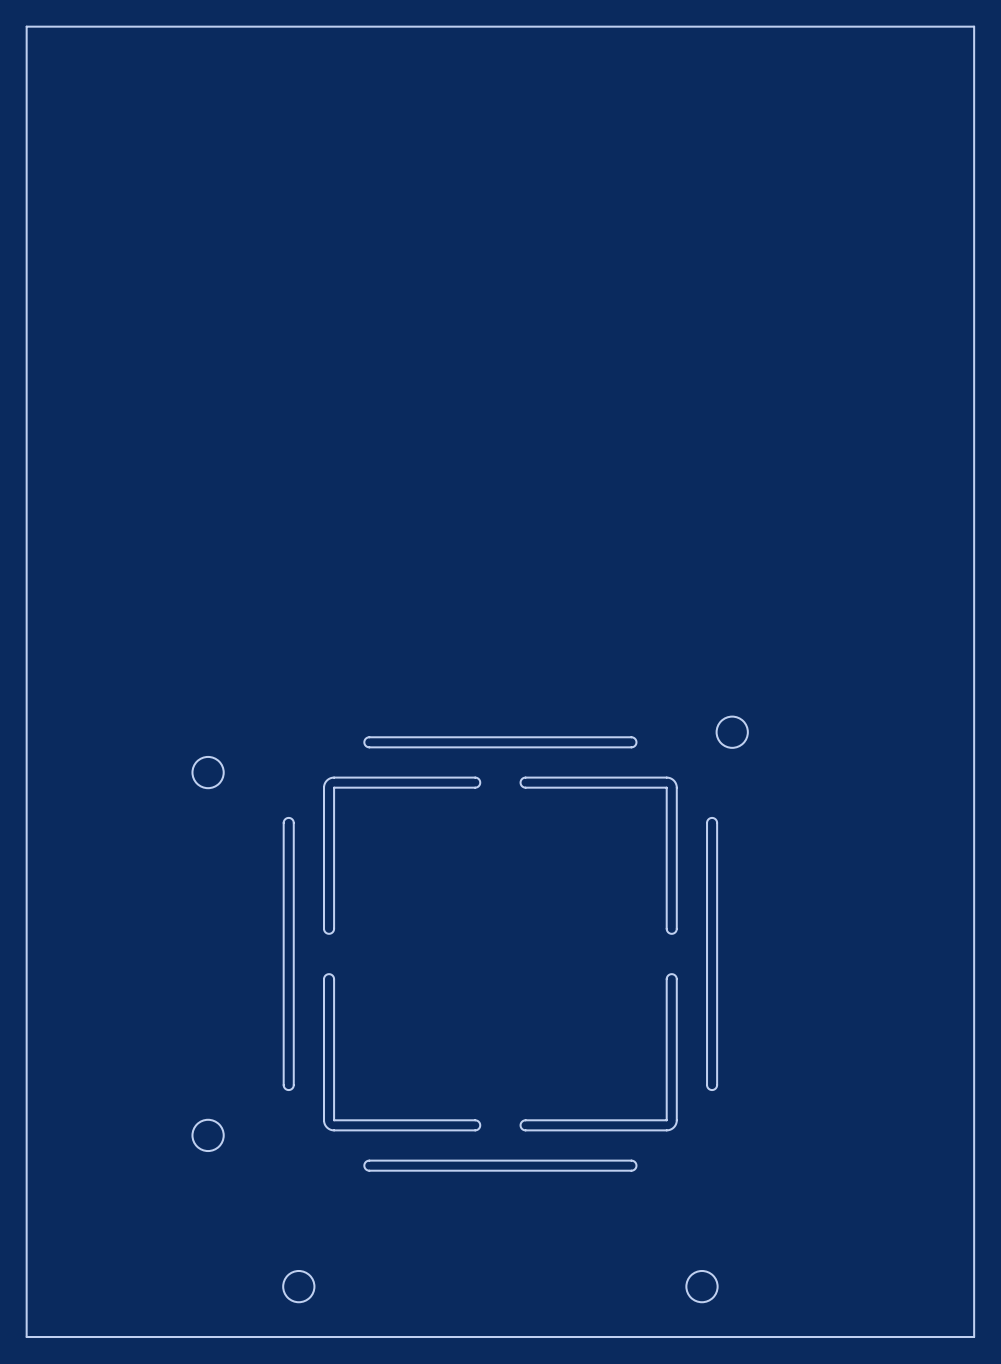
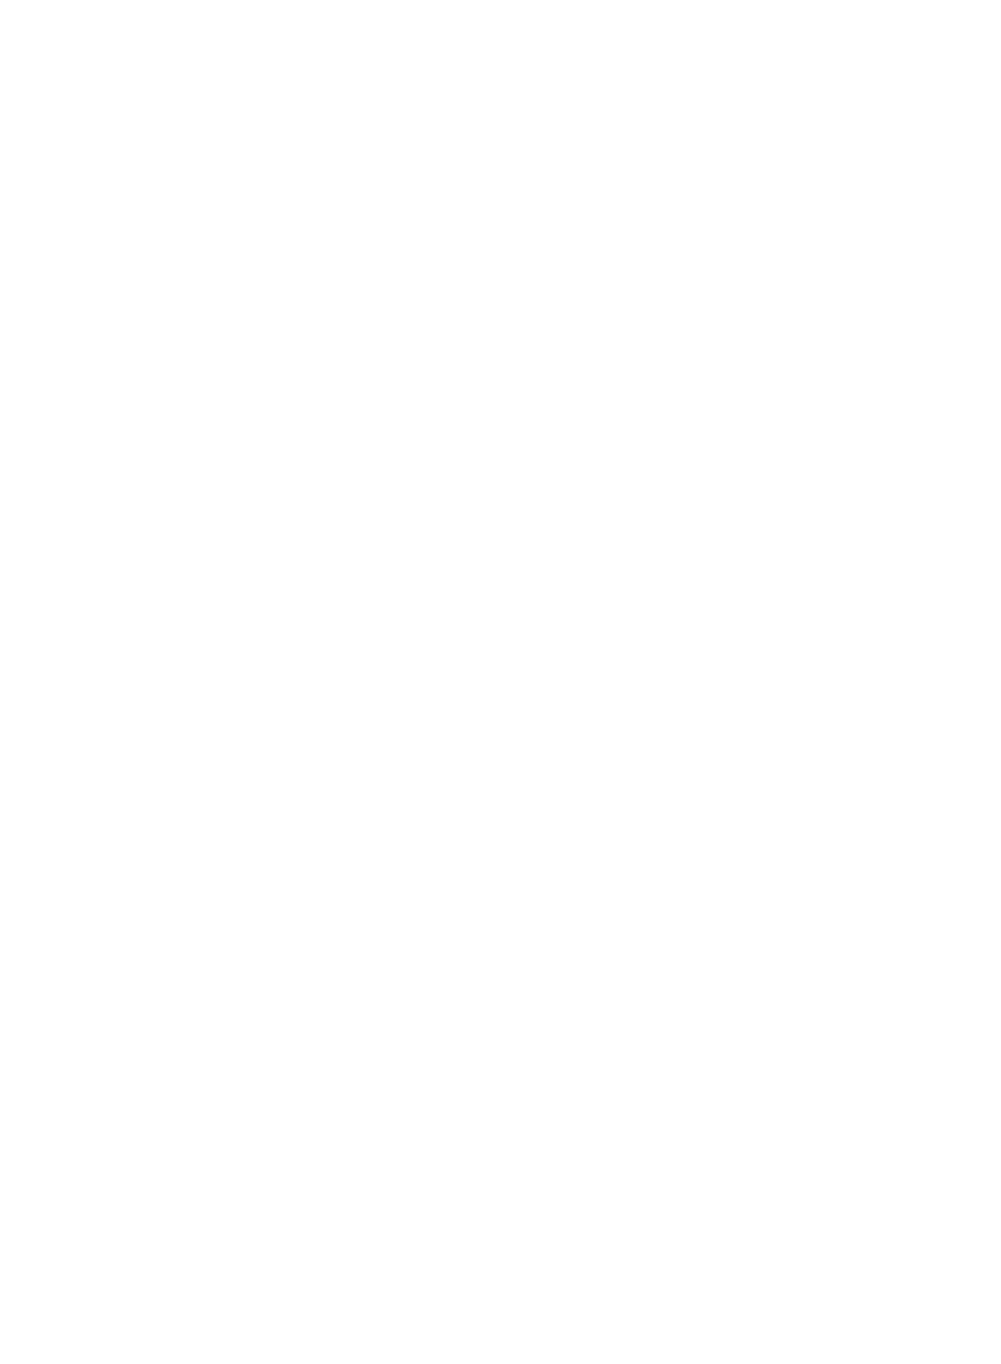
board edge: (974, 26) (26, 26) (26, 1337) (974, 1337) (974, 26) -> none
round board edge: [715, 715, 749, 749] -> none
board edge: (631, 737) (369, 737) (364, 742) (369, 747) (631, 747) (636, 742) (631, 737) -> none
round board edge: [191, 755, 225, 790] -> none
board edge: (475, 777) (334, 777) (326, 780) (324, 787) (325, 932) (330, 933) (334, 928) (334, 787) (475, 787) (480, 782) (475, 777) -> none
board edge: (666, 777) (525, 777) (520, 782) (525, 787) (666, 787) (666, 928) (671, 933) (676, 928) (676, 787) (673, 780) (666, 777) -> none
board edge: (293, 822) (293, 1085) (288, 1090) (283, 1085) (283, 822) (288, 817) (293, 822) -> none
board edge: (717, 822) (717, 1085) (712, 1090) (707, 1085) (707, 822) (712, 817) (717, 822) -> none
board edge: (334, 979) (334, 1120) (475, 1120) (479, 1123) (478, 1128) (334, 1130) (326, 1127) (324, 1120) (324, 979) (329, 974) (334, 979) -> none
board edge: (676, 979) (676, 1120) (673, 1127) (666, 1130) (522, 1128) (520, 1123) (525, 1120) (666, 1120) (666, 978) (671, 974) (676, 979) -> none
round board edge: [191, 1118, 225, 1153] -> none
board edge: (631, 1160) (369, 1160) (364, 1165) (369, 1170) (631, 1170) (636, 1165) (631, 1160) -> none
round board edge: [282, 1269, 316, 1304] -> none
round board edge: [685, 1269, 719, 1304] -> none

